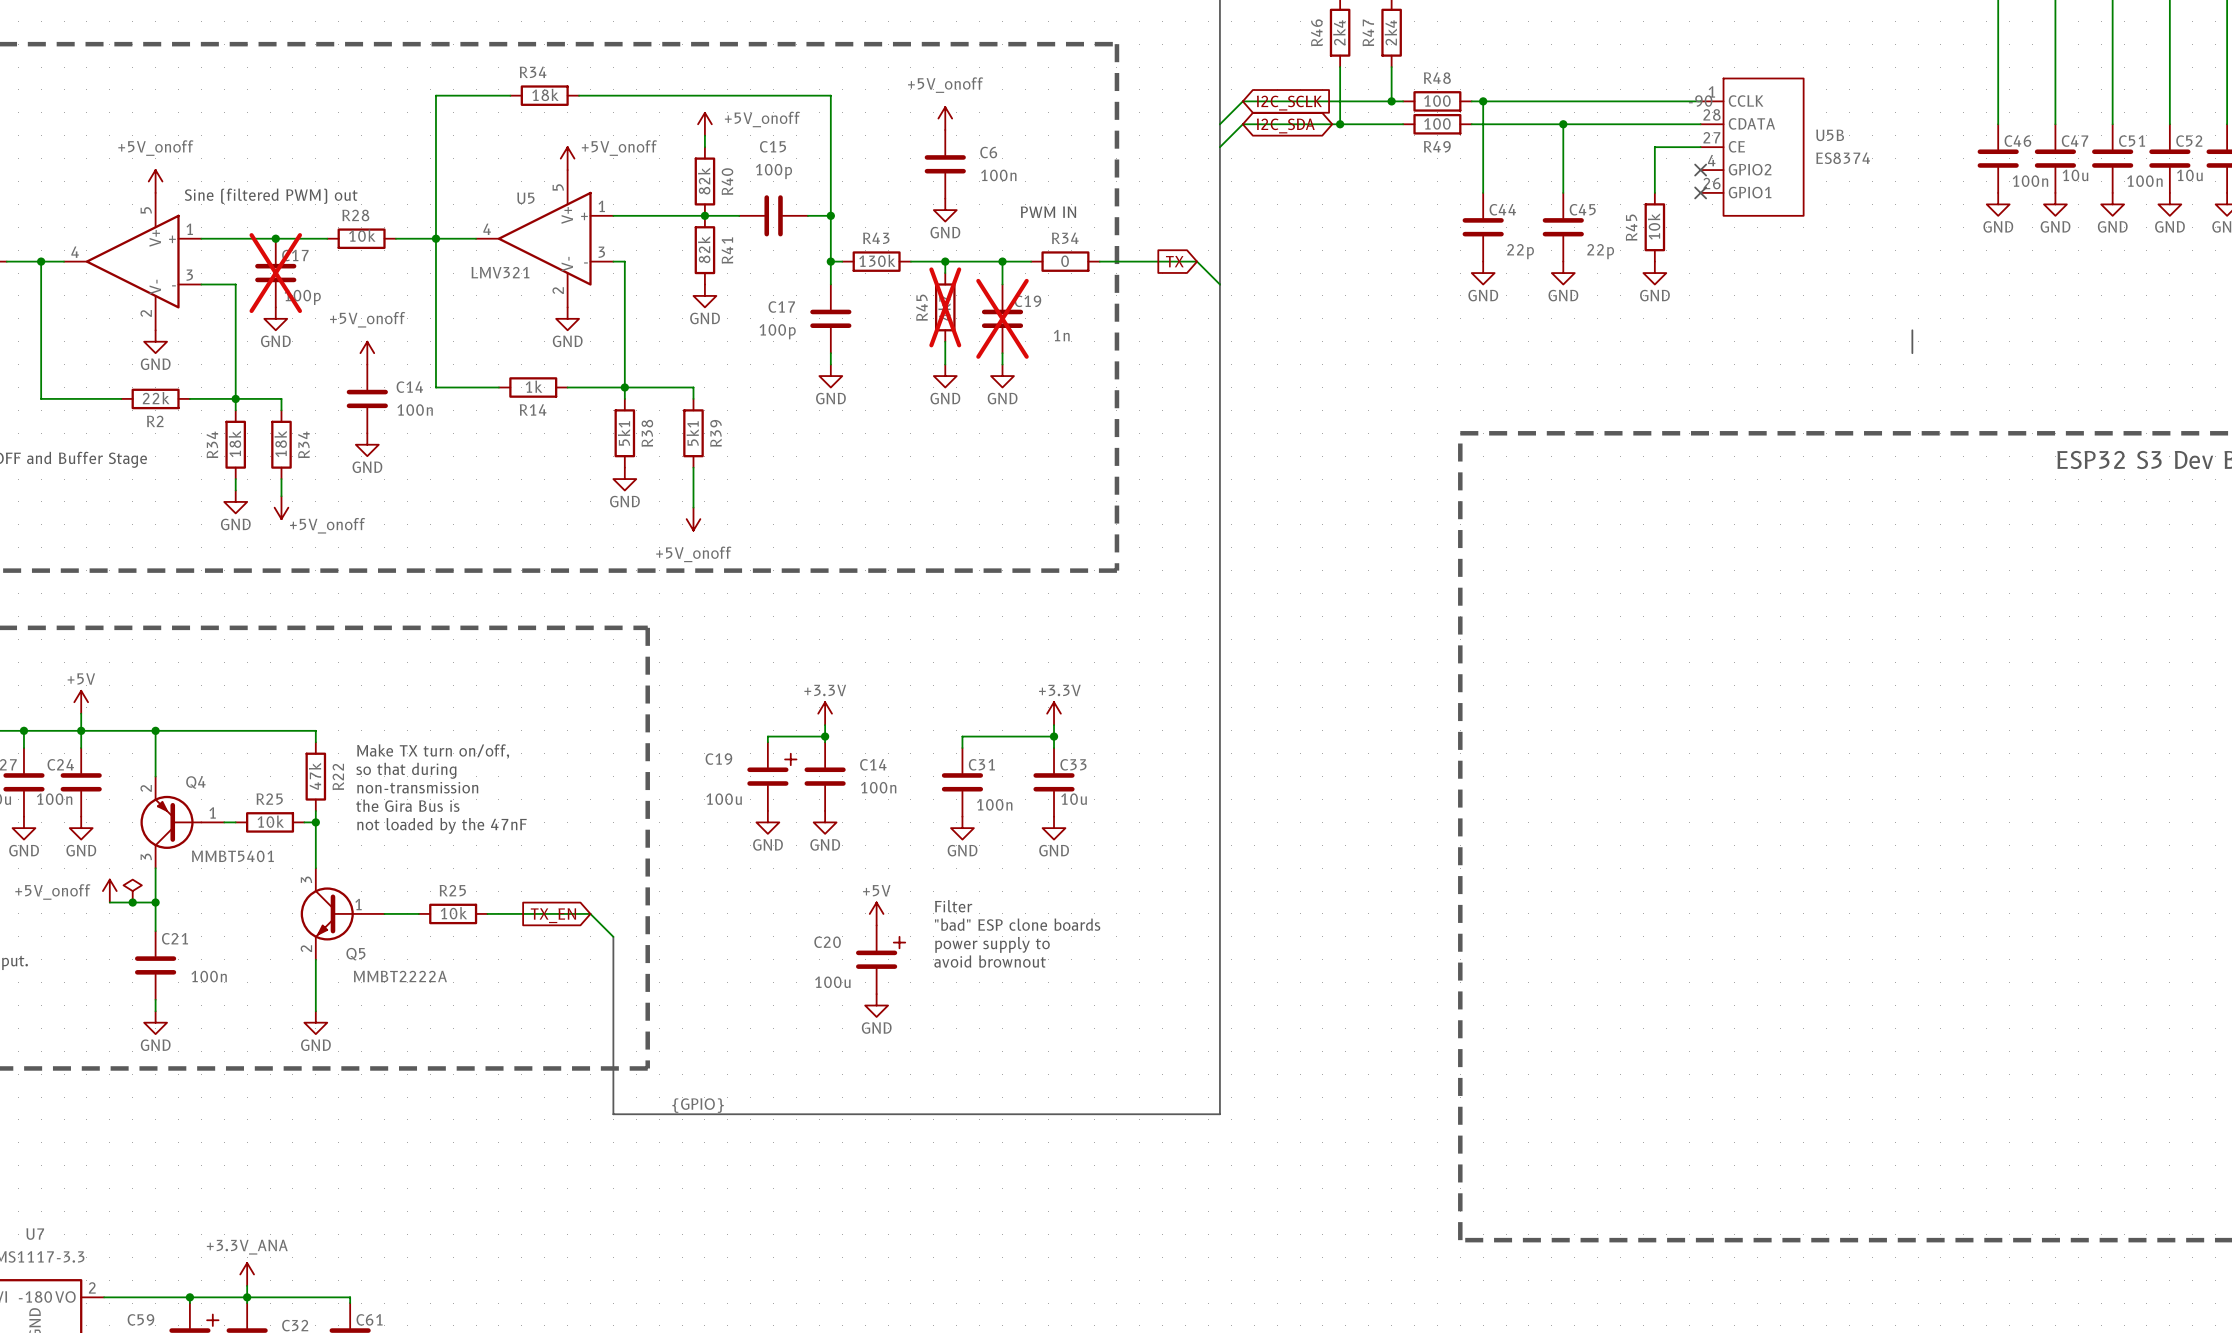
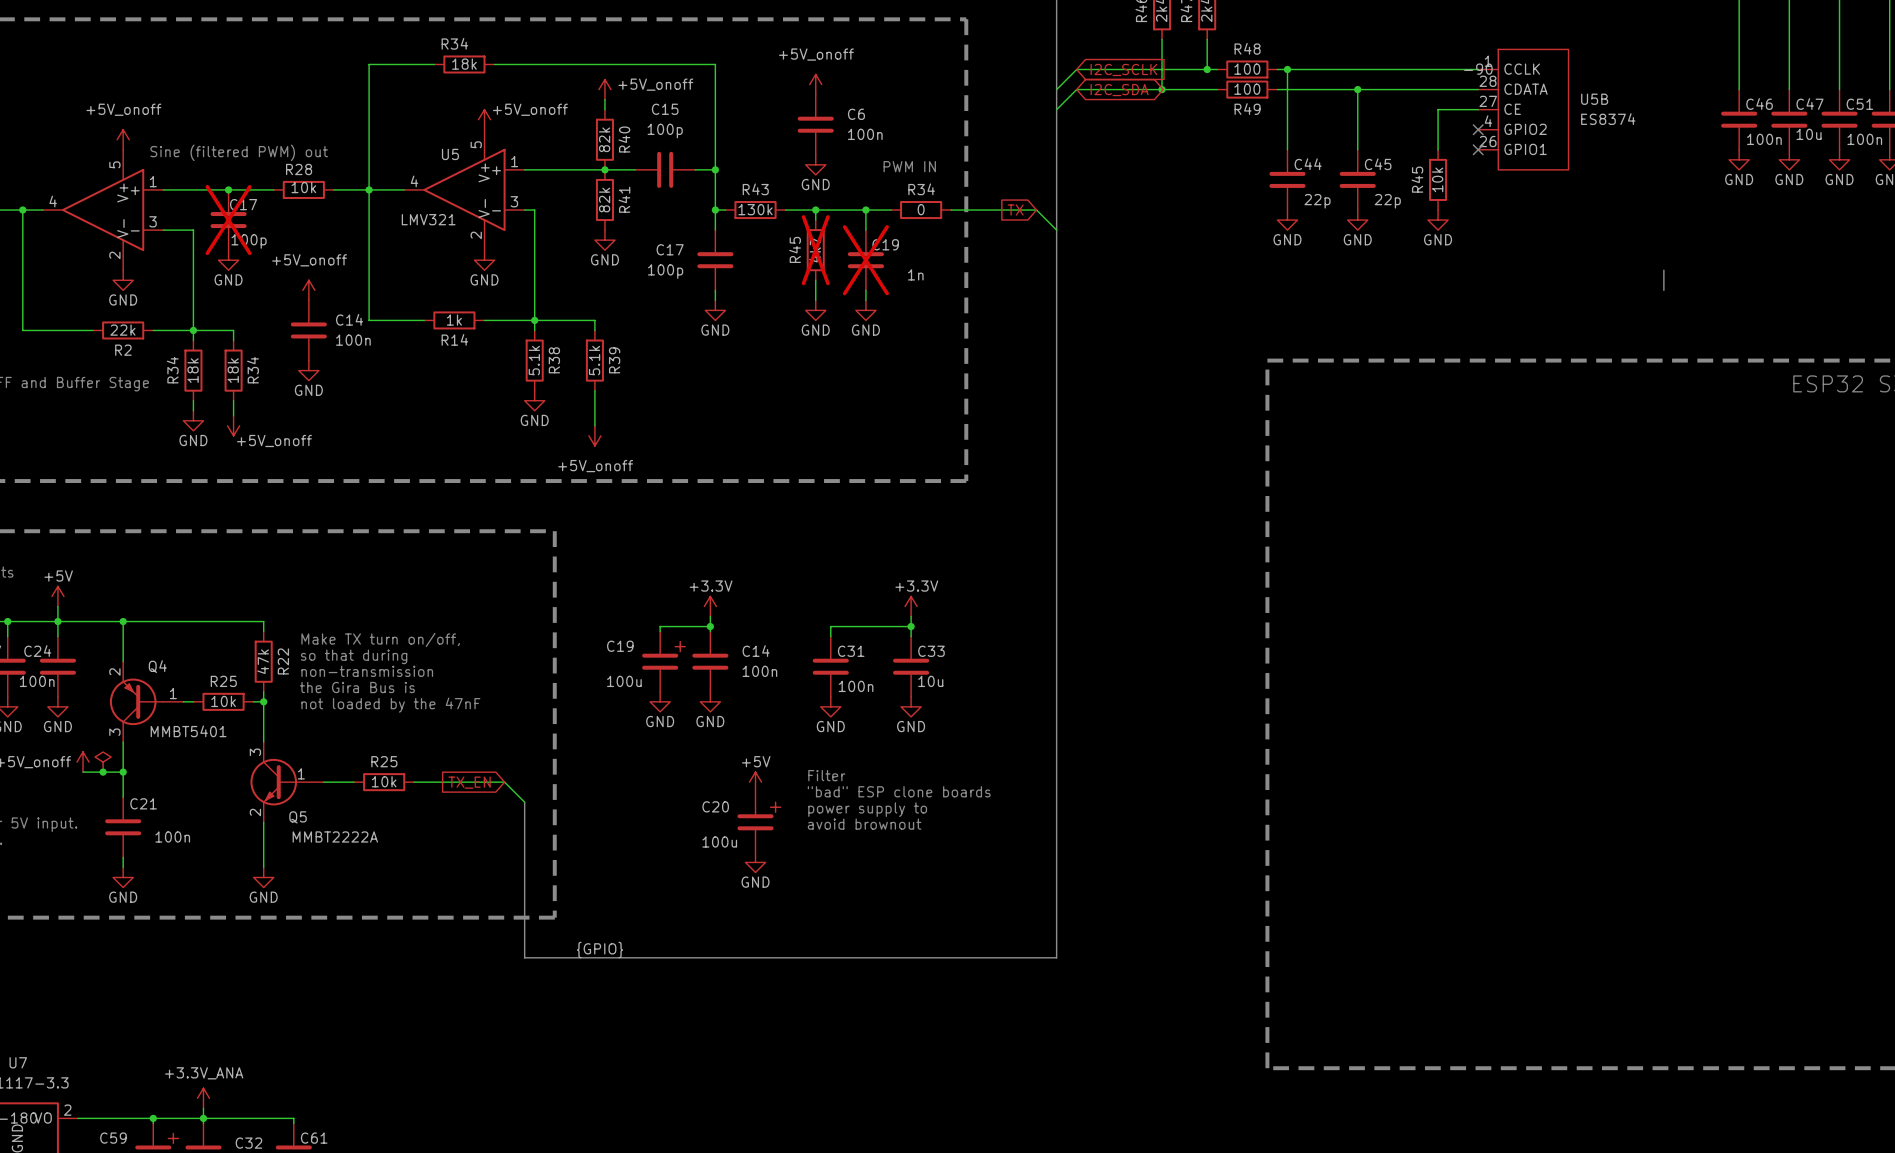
R38 value: 5k1 (624, 433) -> 5.1k (534, 360)
R39 value: 5k1 (692, 433) -> 5.1k (594, 360)

